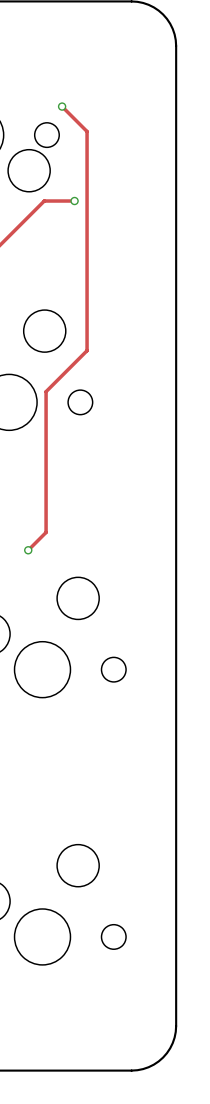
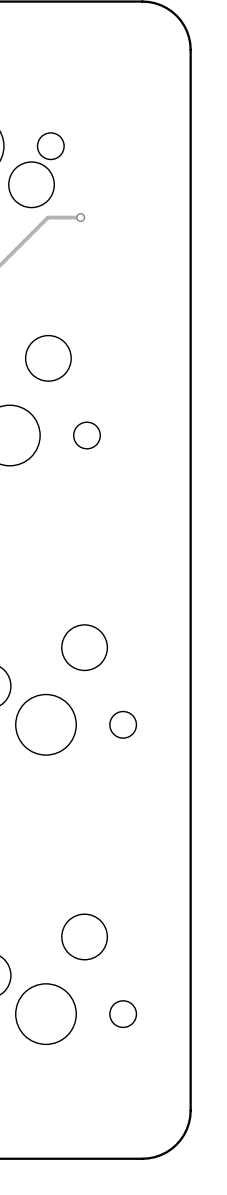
track: (62, 106) (87, 131) (87, 350) (46, 391) (46, 532) (28, 550) -> none
via: (62, 106) -> none
via: (28, 550) -> none

